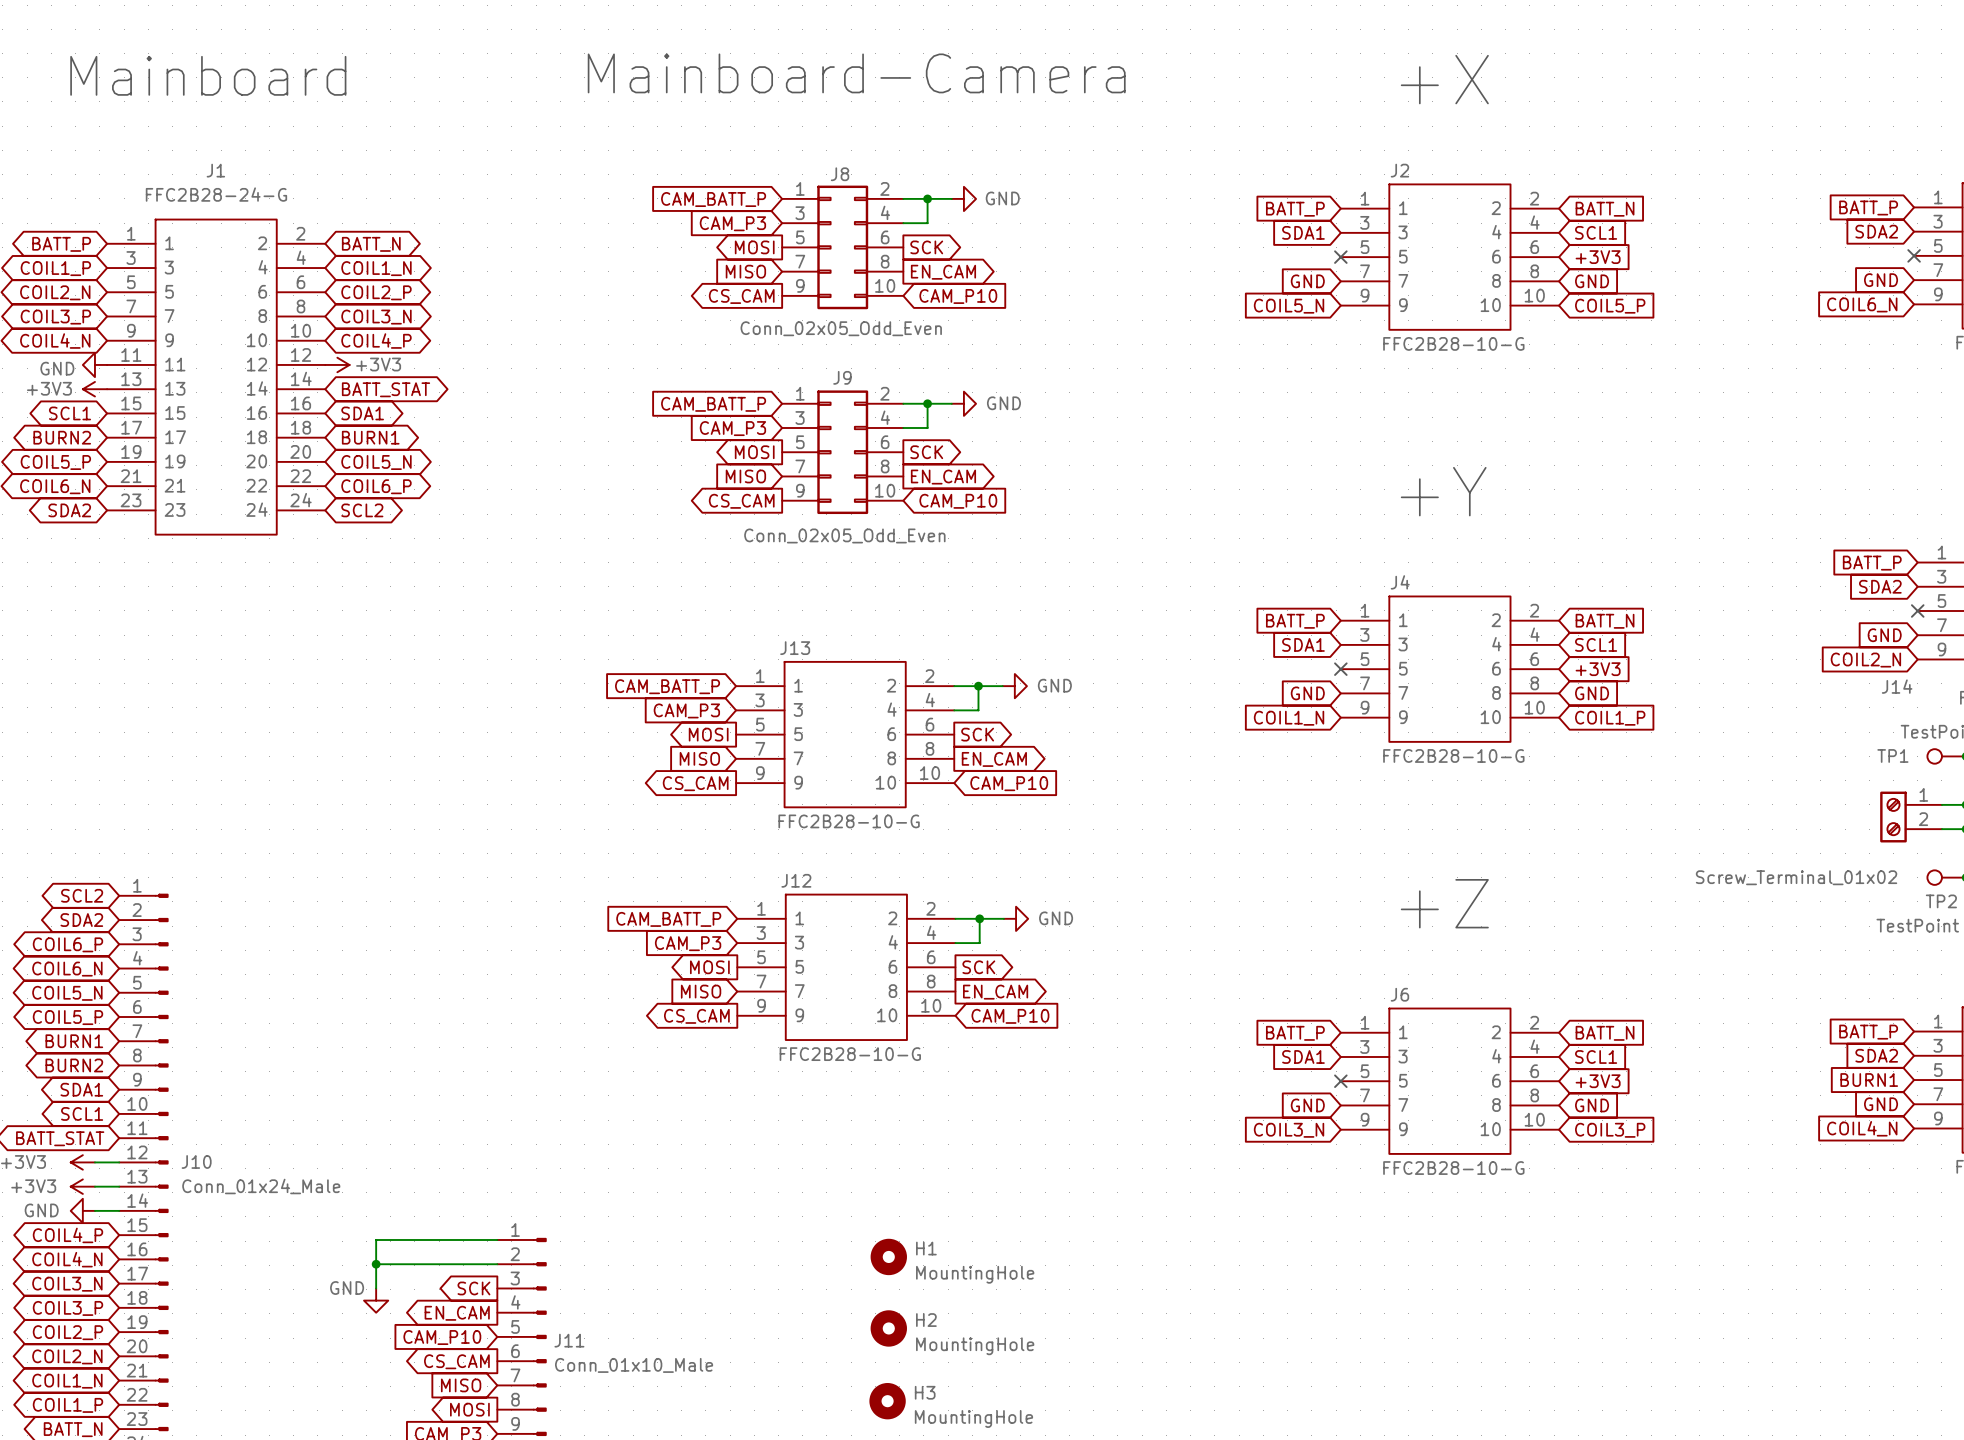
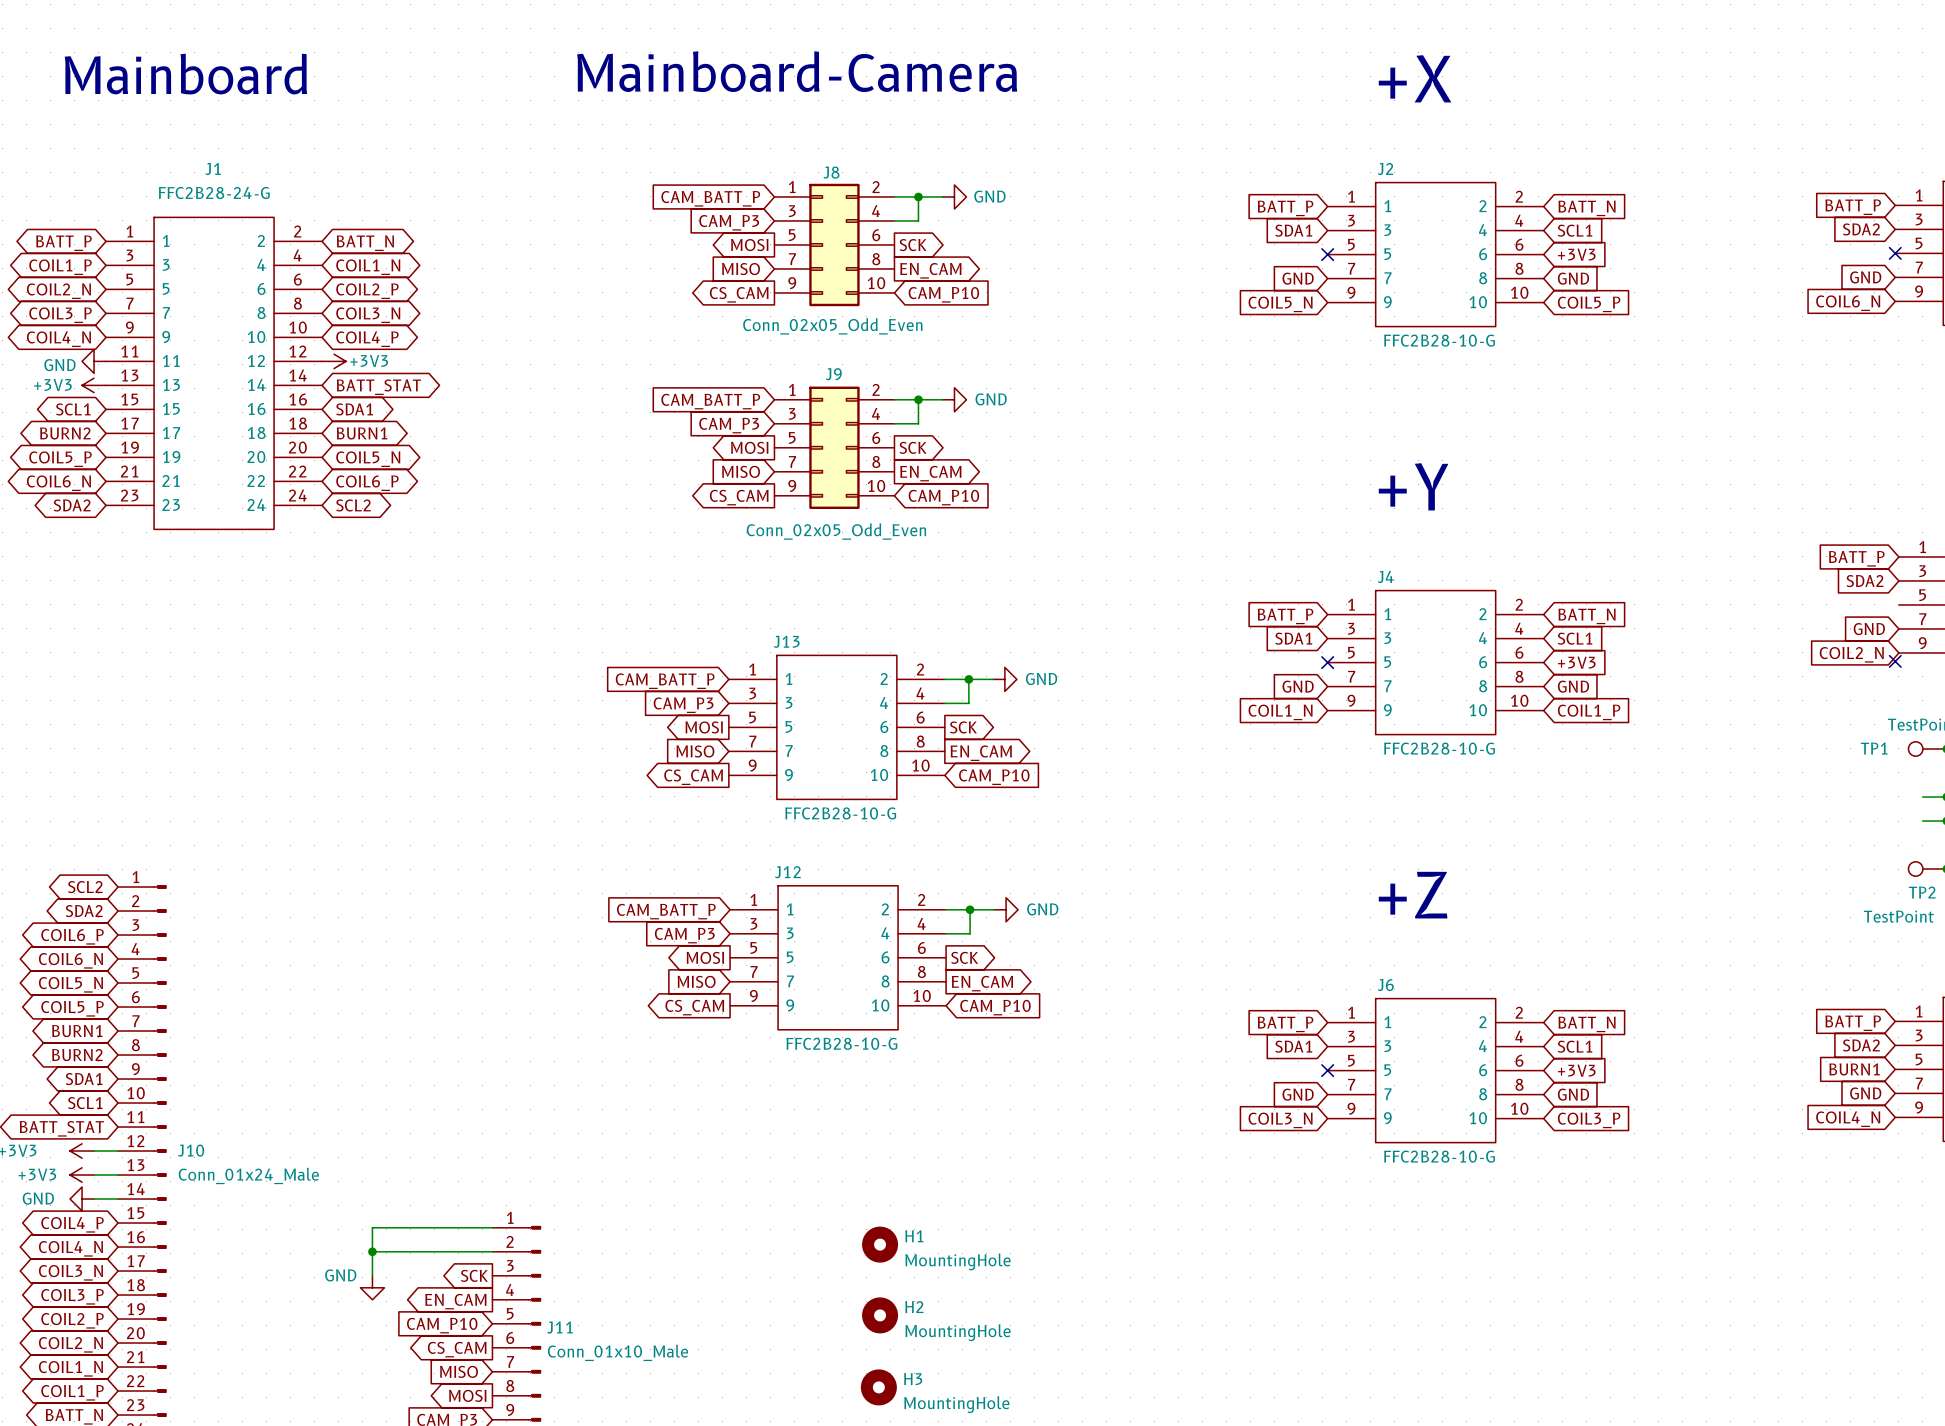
no-connect mark position: (1917, 610) -> (1895, 661)
J14: Screw_Terminal_01x02 (1911, 817) -> none

